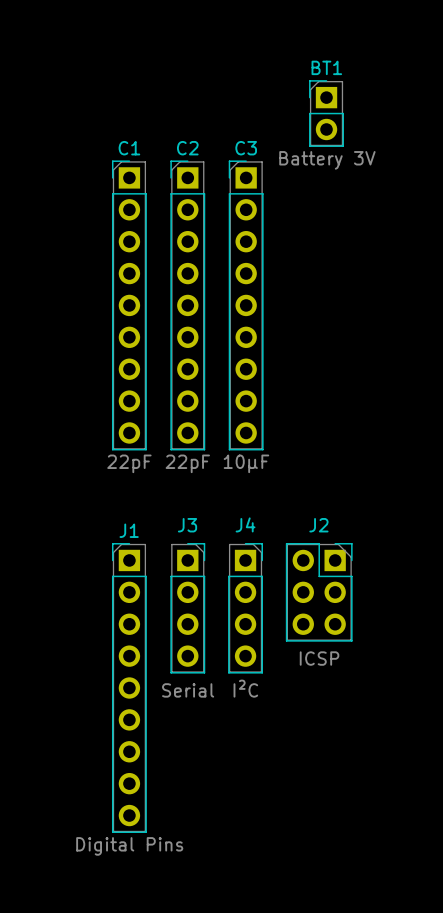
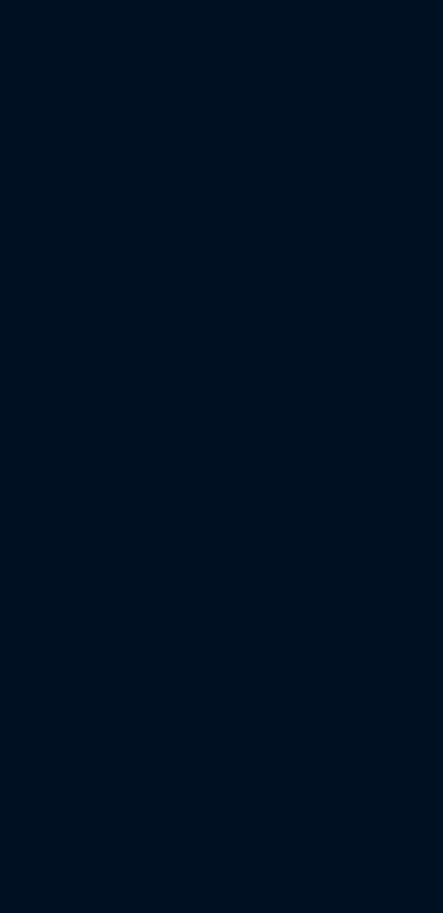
BT1: Battery 3V (326, 113) -> none
C1: 22pF (129, 305) -> none
C2: 22pF (187, 305) -> none
C3: 10µF (246, 305) -> none
J2: ICSP (319, 592) -> none
J3: Serial (187, 608) -> none
J4: I²C (245, 608) -> none
J1: Digital Pins (129, 688) -> none

